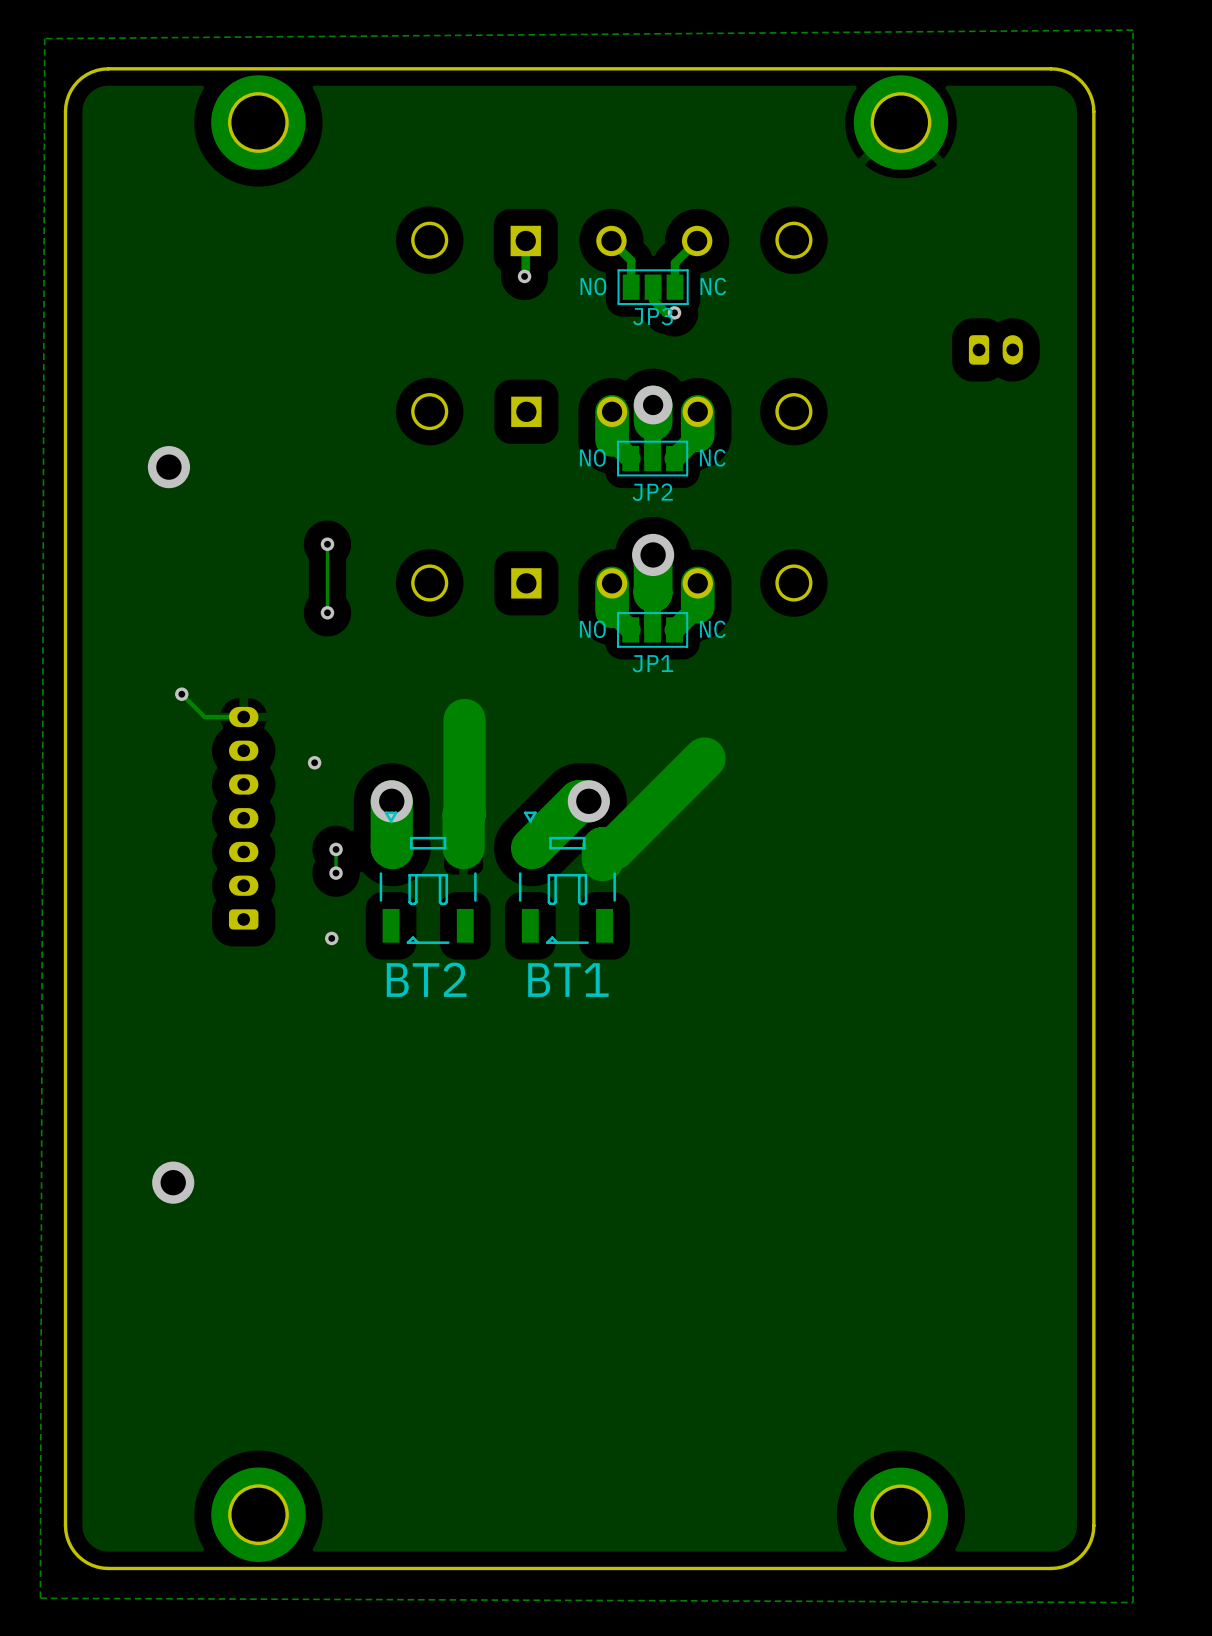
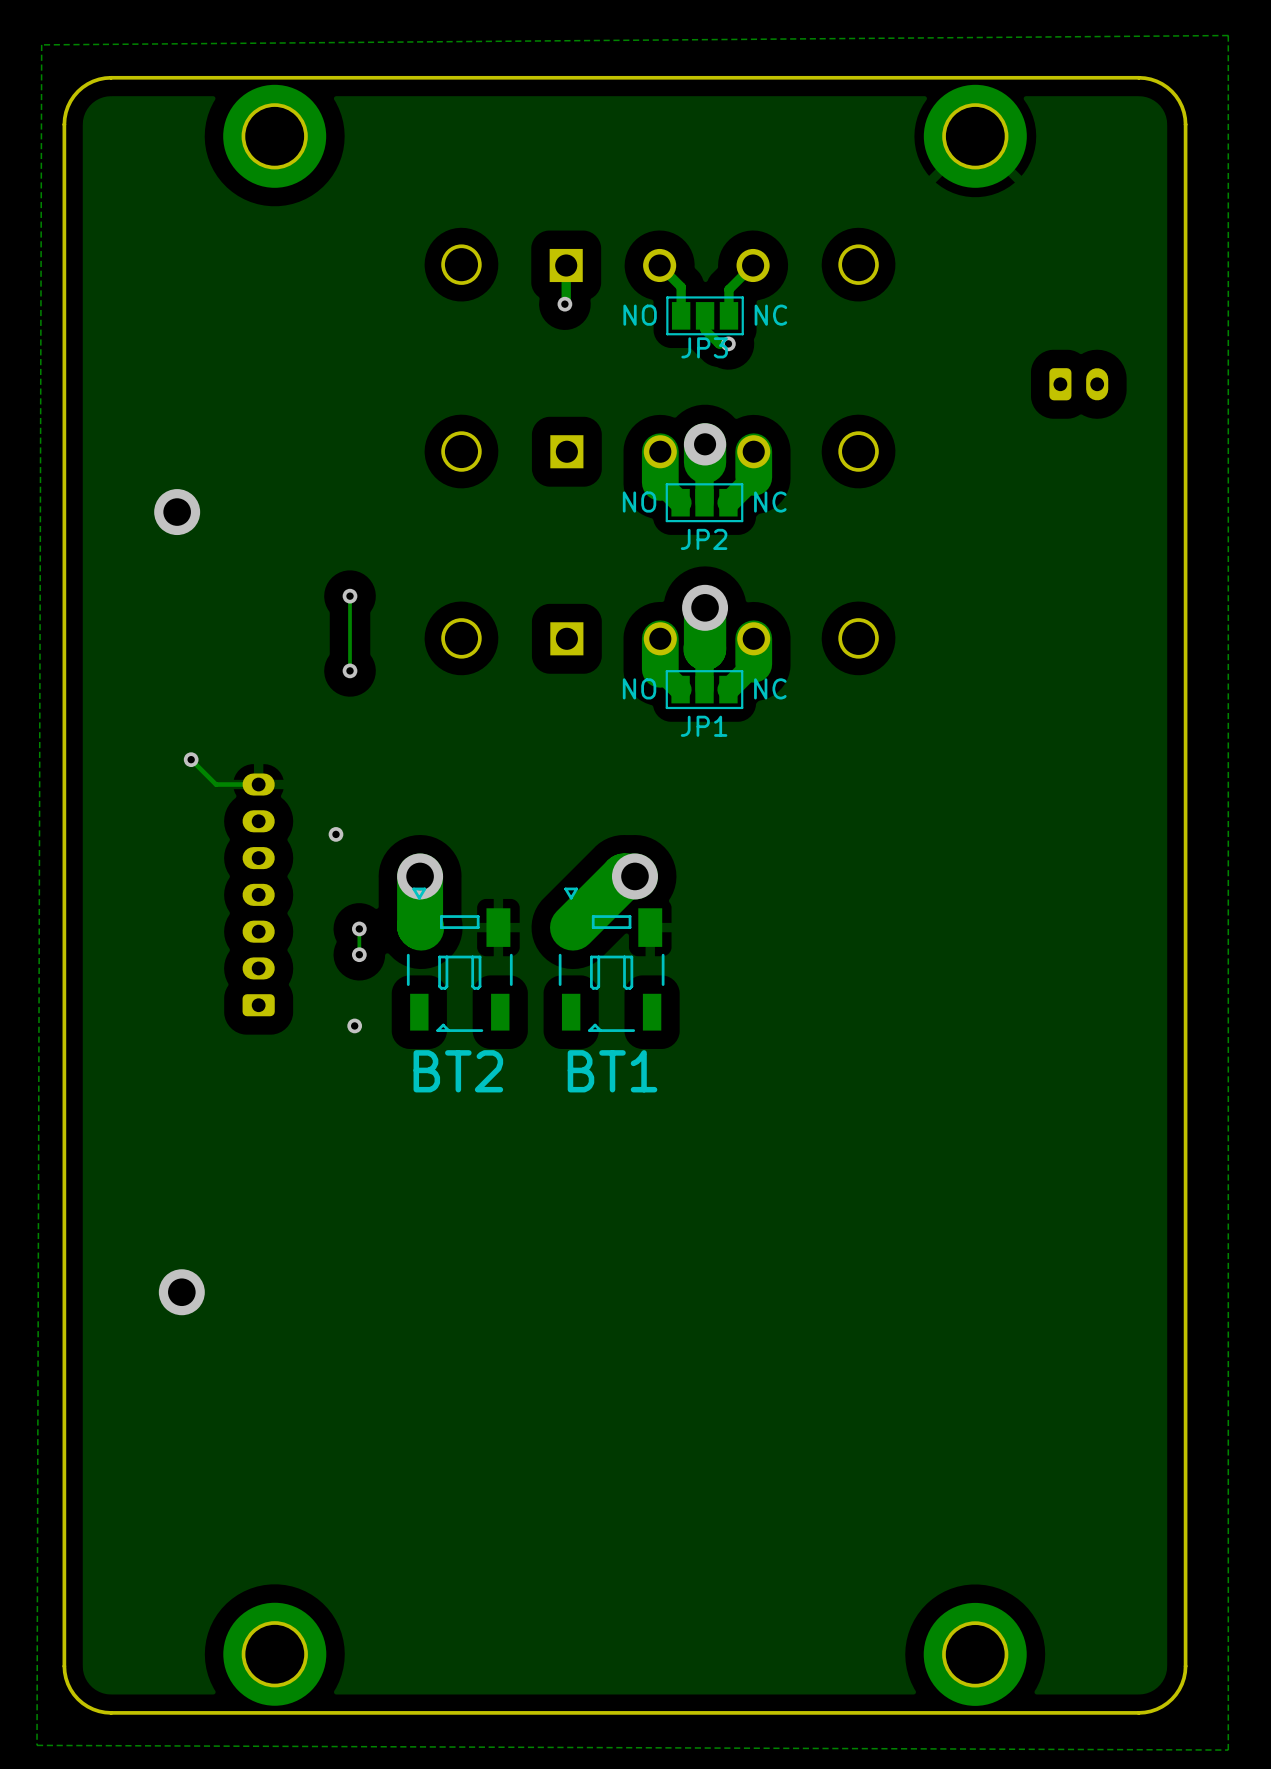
track: (464, 719) (463, 848) -> none
track: (704, 758) (614, 848) (602, 848) (602, 860) -> none

